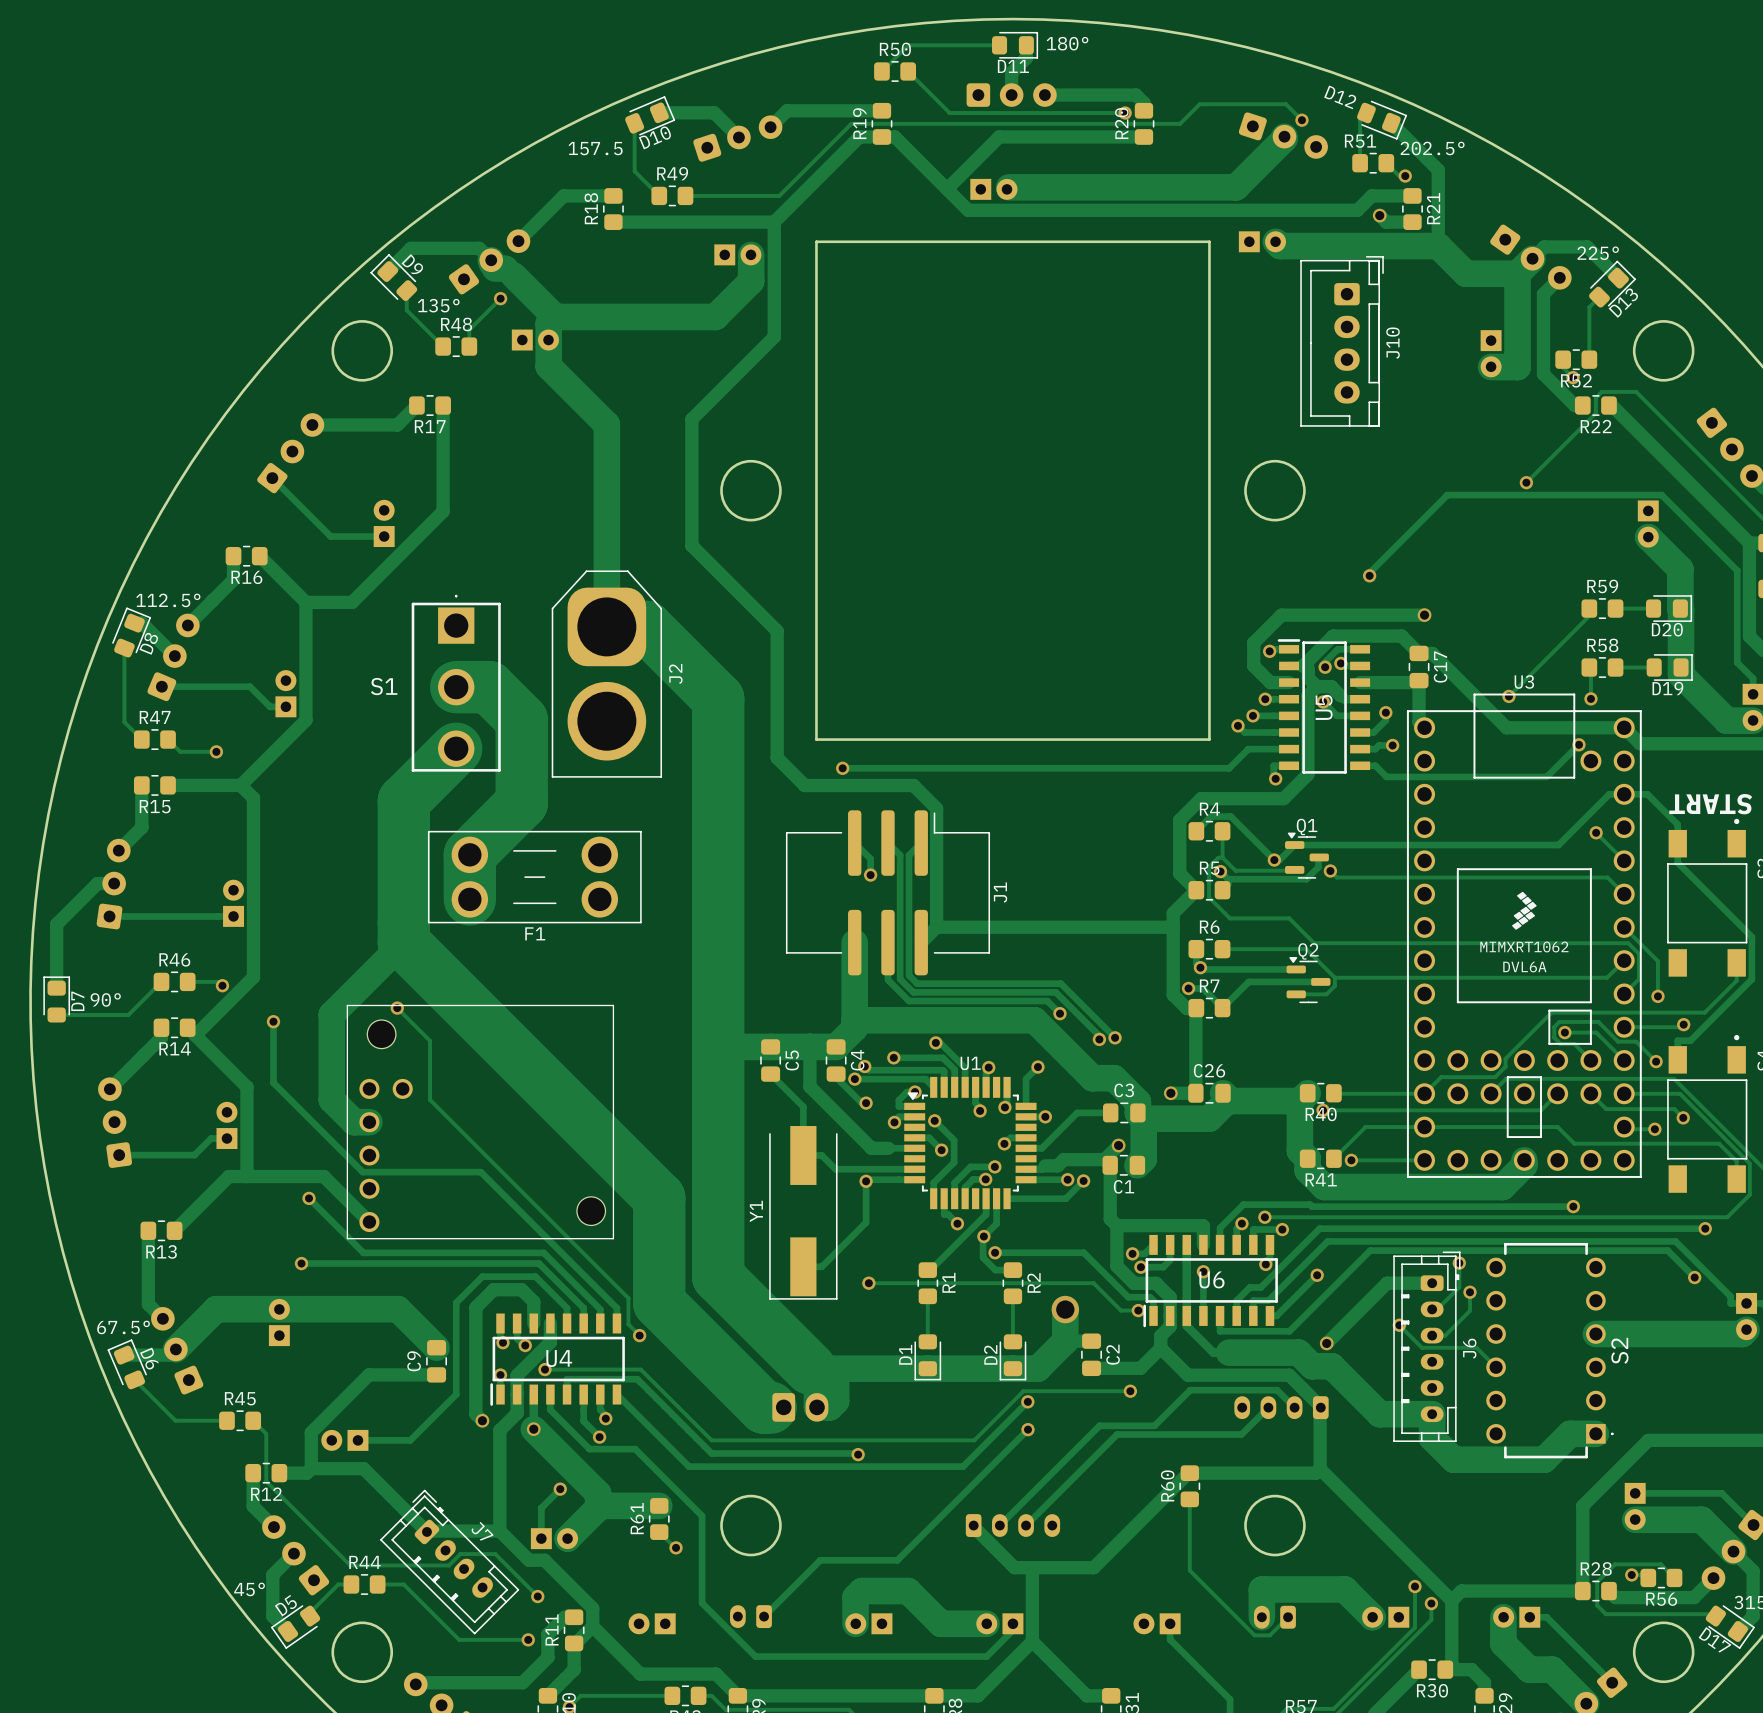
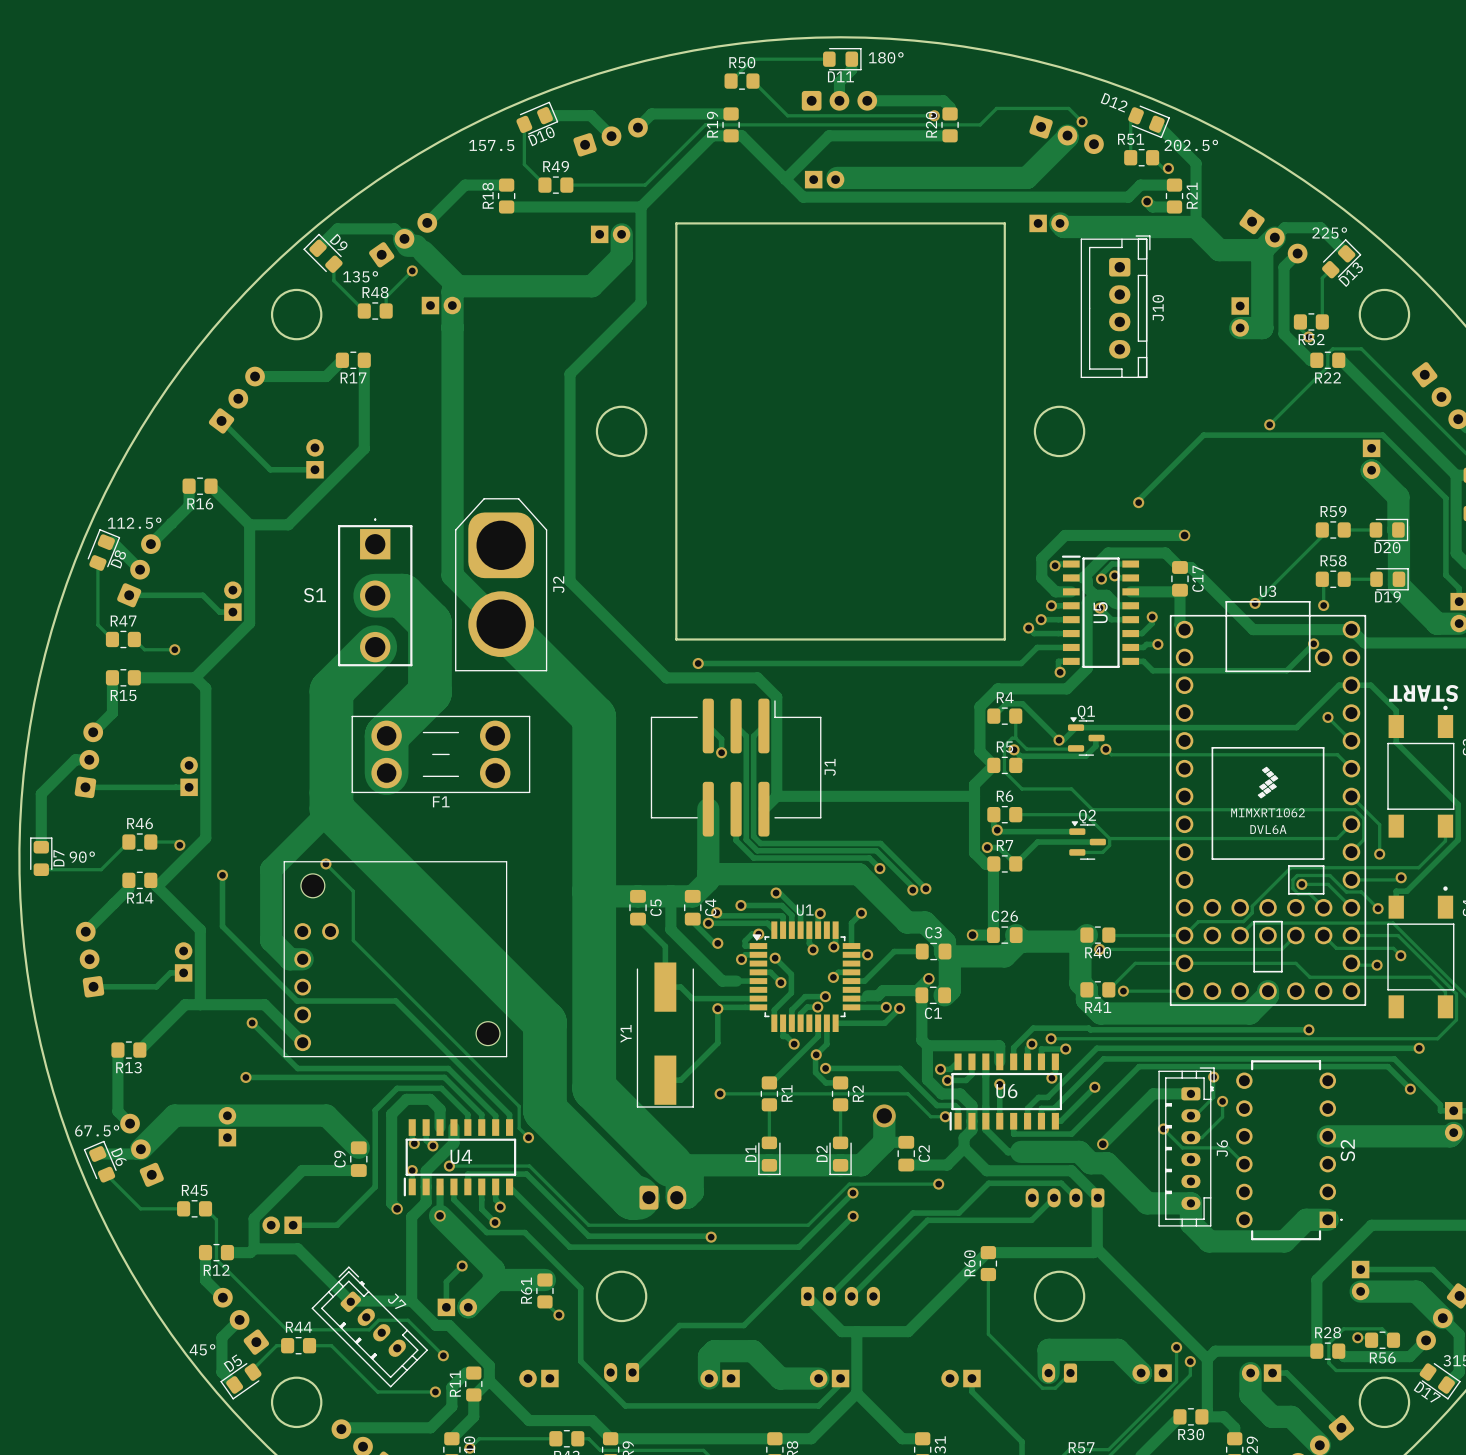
track: (548, 366) (606, 424) (606, 626) (646, 626) (718, 698) (718, 832) -> (452, 327) (452, 575) (594, 717)
track: (691, 419) (691, 545) (777, 631) (777, 757) -> (572, 371) (570, 373) (570, 581) (643, 654)

